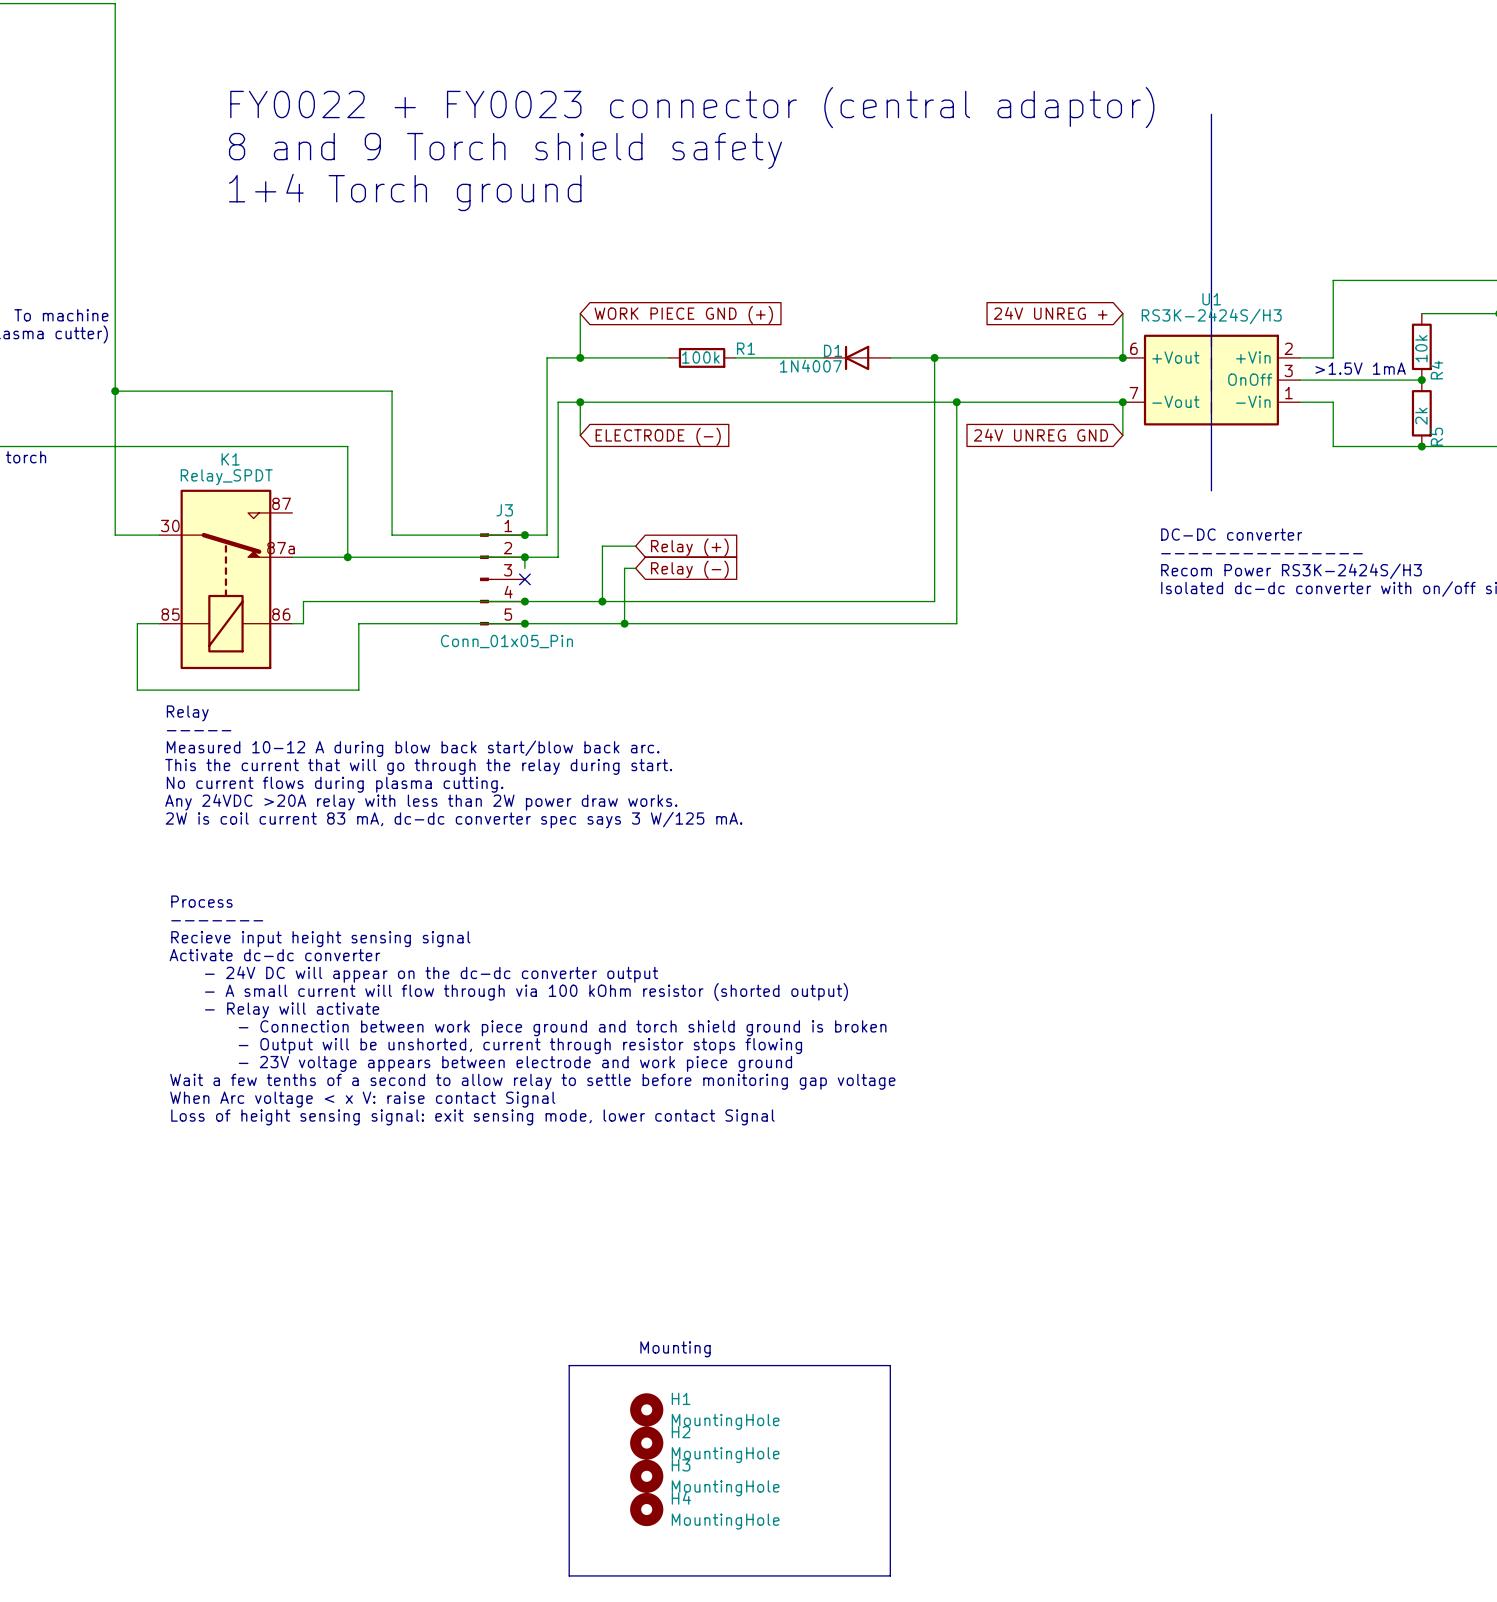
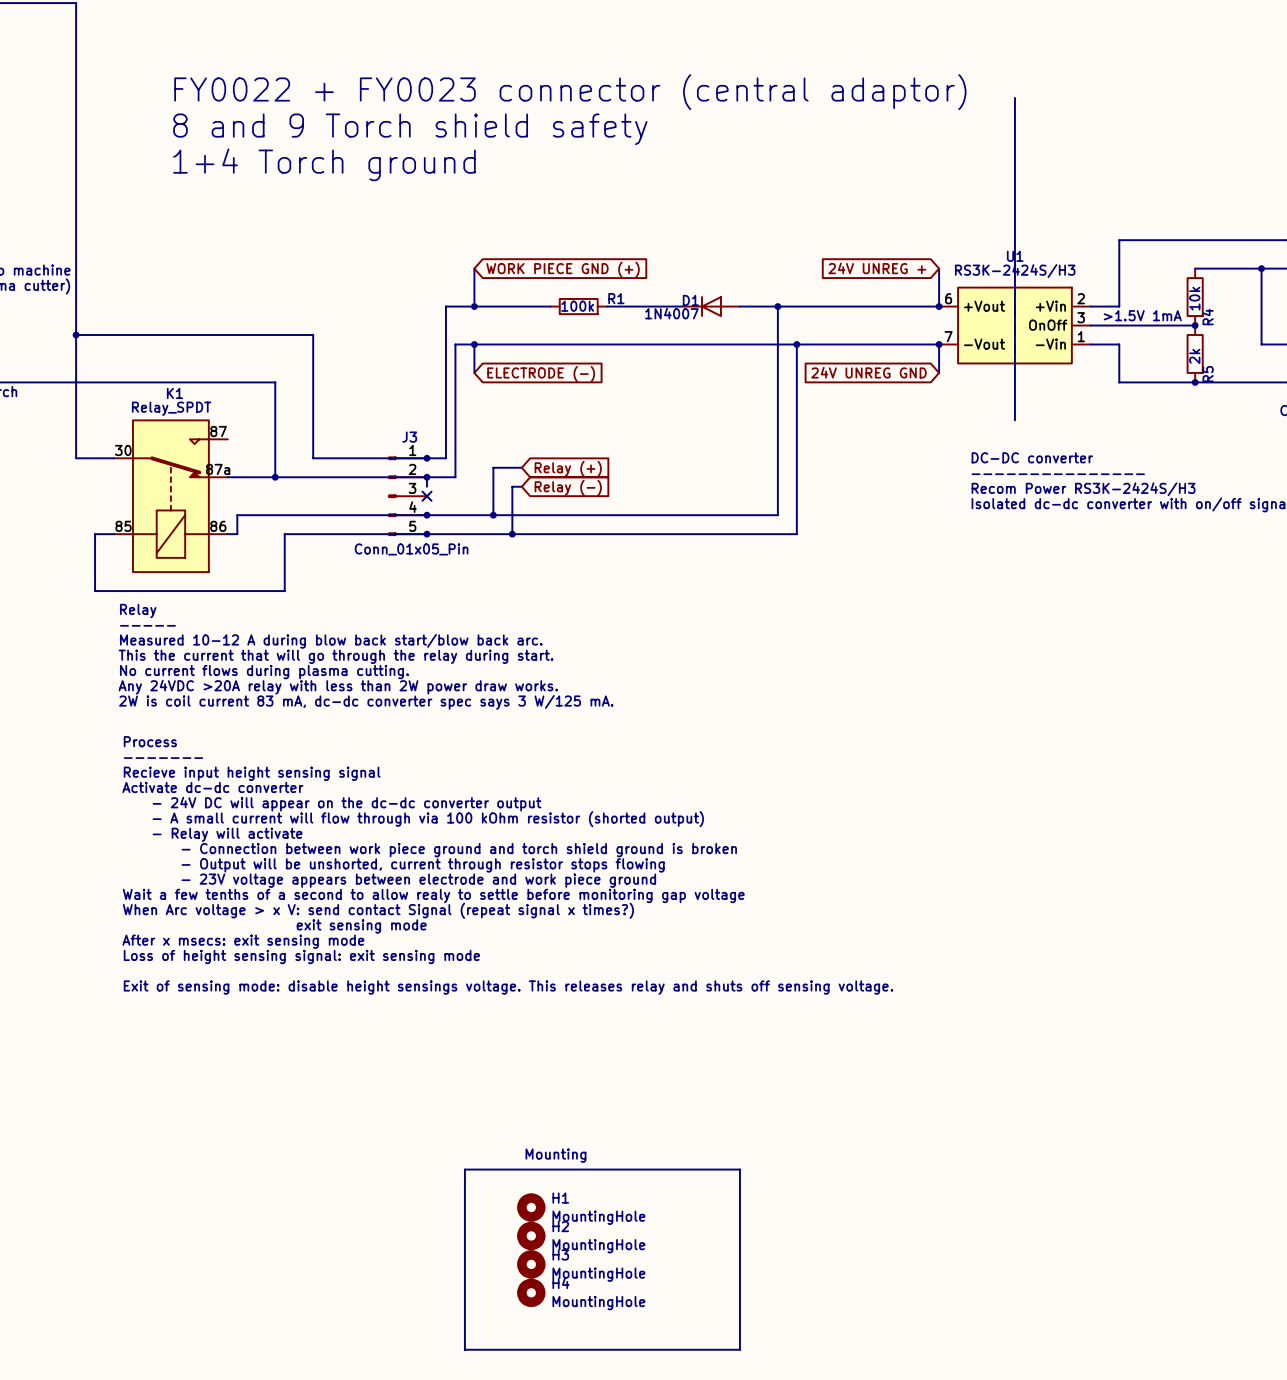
text: none -> Process (150, 741)
text: none -> ------- (163, 758)
text: Process (201, 901) -> Recieve input height sensing signal (252, 773)
text: ------- (217, 920) -> Activate dc-dc converter (212, 787)
text: Recieve input height sensing signal (320, 939) -> - 24V DC will appear on the dc-dc converter output (347, 804)
text: Activate dc-dc converter (274, 955) -> - A small current will flow through via 100 kOhm resistor (shorted output) (428, 819)
text: - 24V DC will appear on the dc-dc converter output (431, 974) -> - Relay will activate (227, 834)
text: - A small current will flow through via 100 kOhm resistor (shorted output) (526, 992) -> - Connection between work piece ground and torch shield ground is broken (459, 850)
text: - Relay will activate (292, 1010) -> - Output will be unshorted, current through resistor stops flowing (423, 865)
text: - Connection between work piece ground and torch shield ground is broken (562, 1028) -> - 23V voltage appears between electrode and work piece ground (418, 880)
text: - Output will be unshorted, current through resistor stops flowing (520, 1046) -> Wait a few tenths of a second to allow realy to settle before monitoring gap voltage (433, 895)
text: - 23V voltage appears between electrode and work piece ground (515, 1063) -> When Arc voltage > x V: send contact Signal (repeat signal x times?) (378, 910)
text: Wait a few tenths of a second to allow relay to settle before monitoring gap voltage (532, 1081) -> exit sensing mode (361, 926)
text: When Arc voltage < x V: raise contact Signal (362, 1099) -> After x msecs: exit sensing mode (243, 941)
text: Loss of height sensing signal: exit sensing mode, lower contact Signal (472, 1117) -> Loss of height sensing signal: exit sensing mode (301, 957)
text: none -> Exit of sensing mode: disable height sensings voltage. This releases relay and shuts off sensing voltage. (508, 987)

